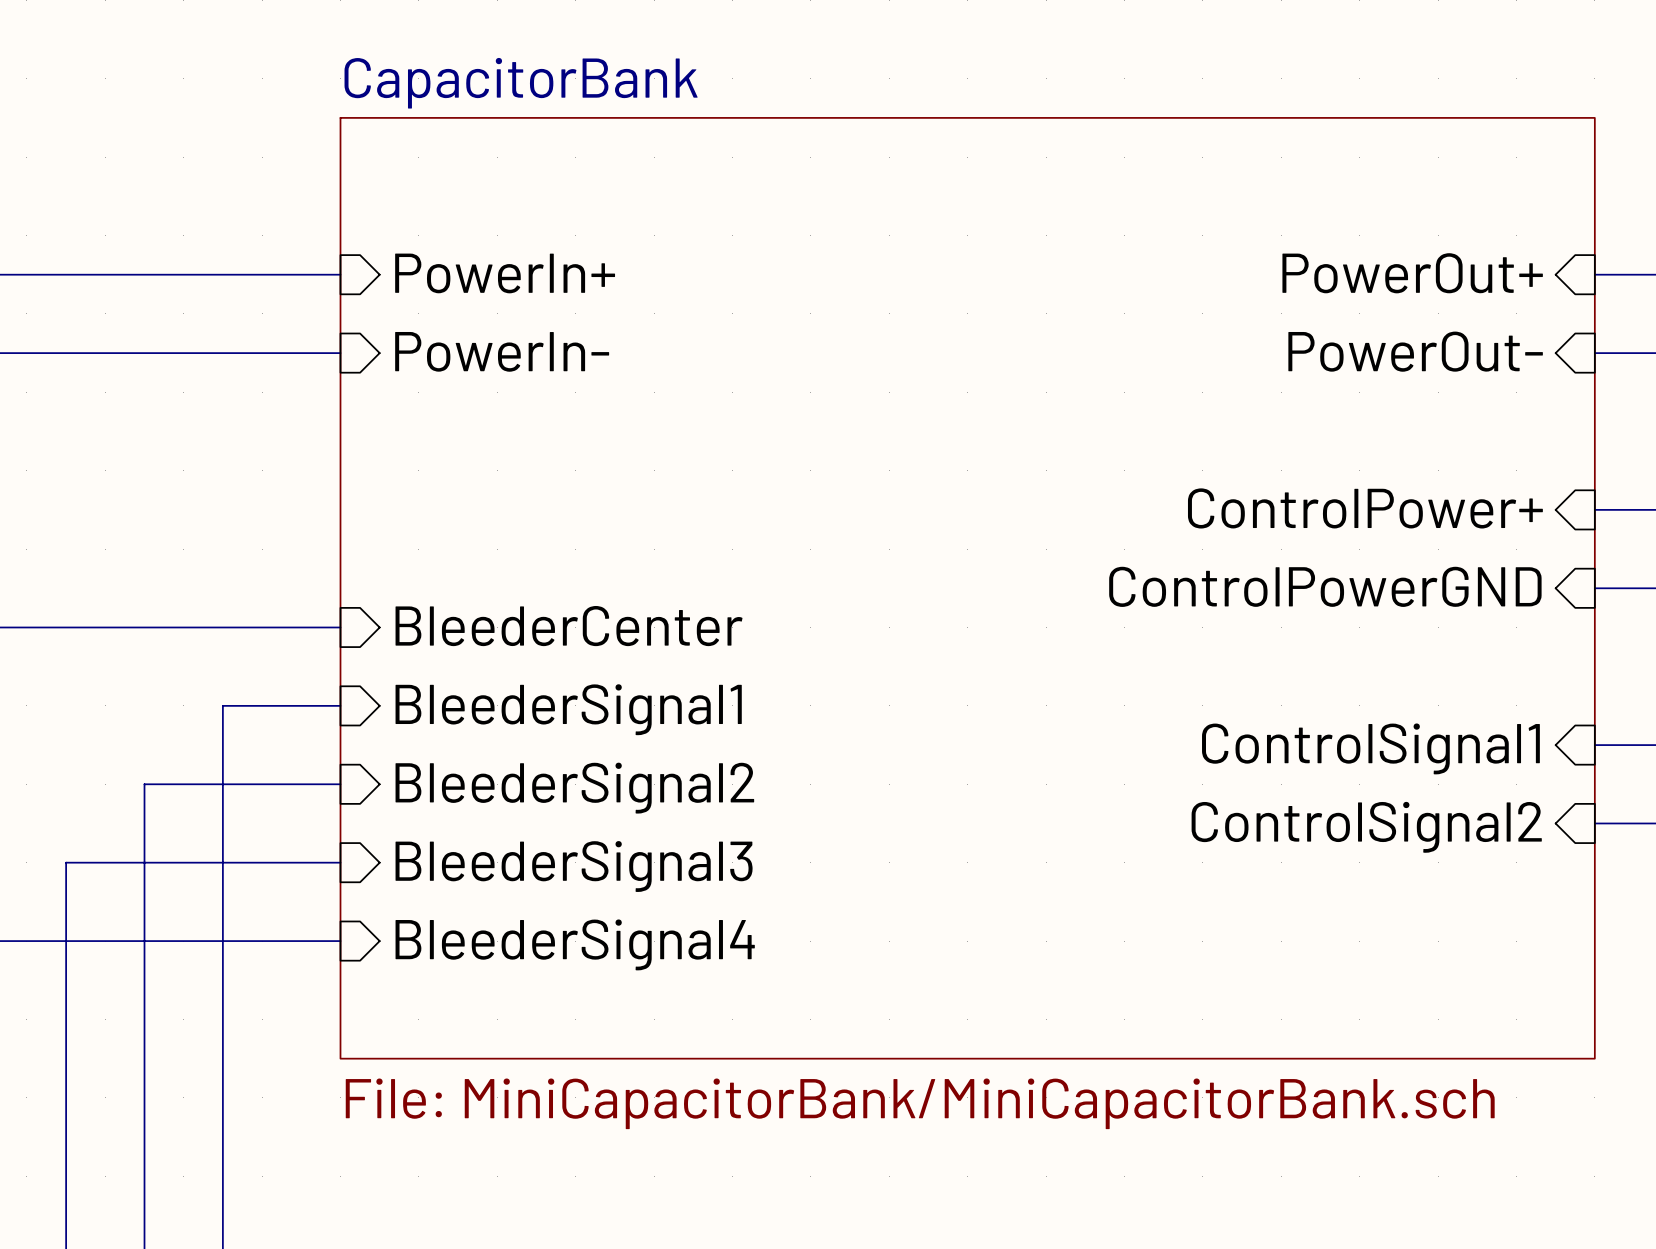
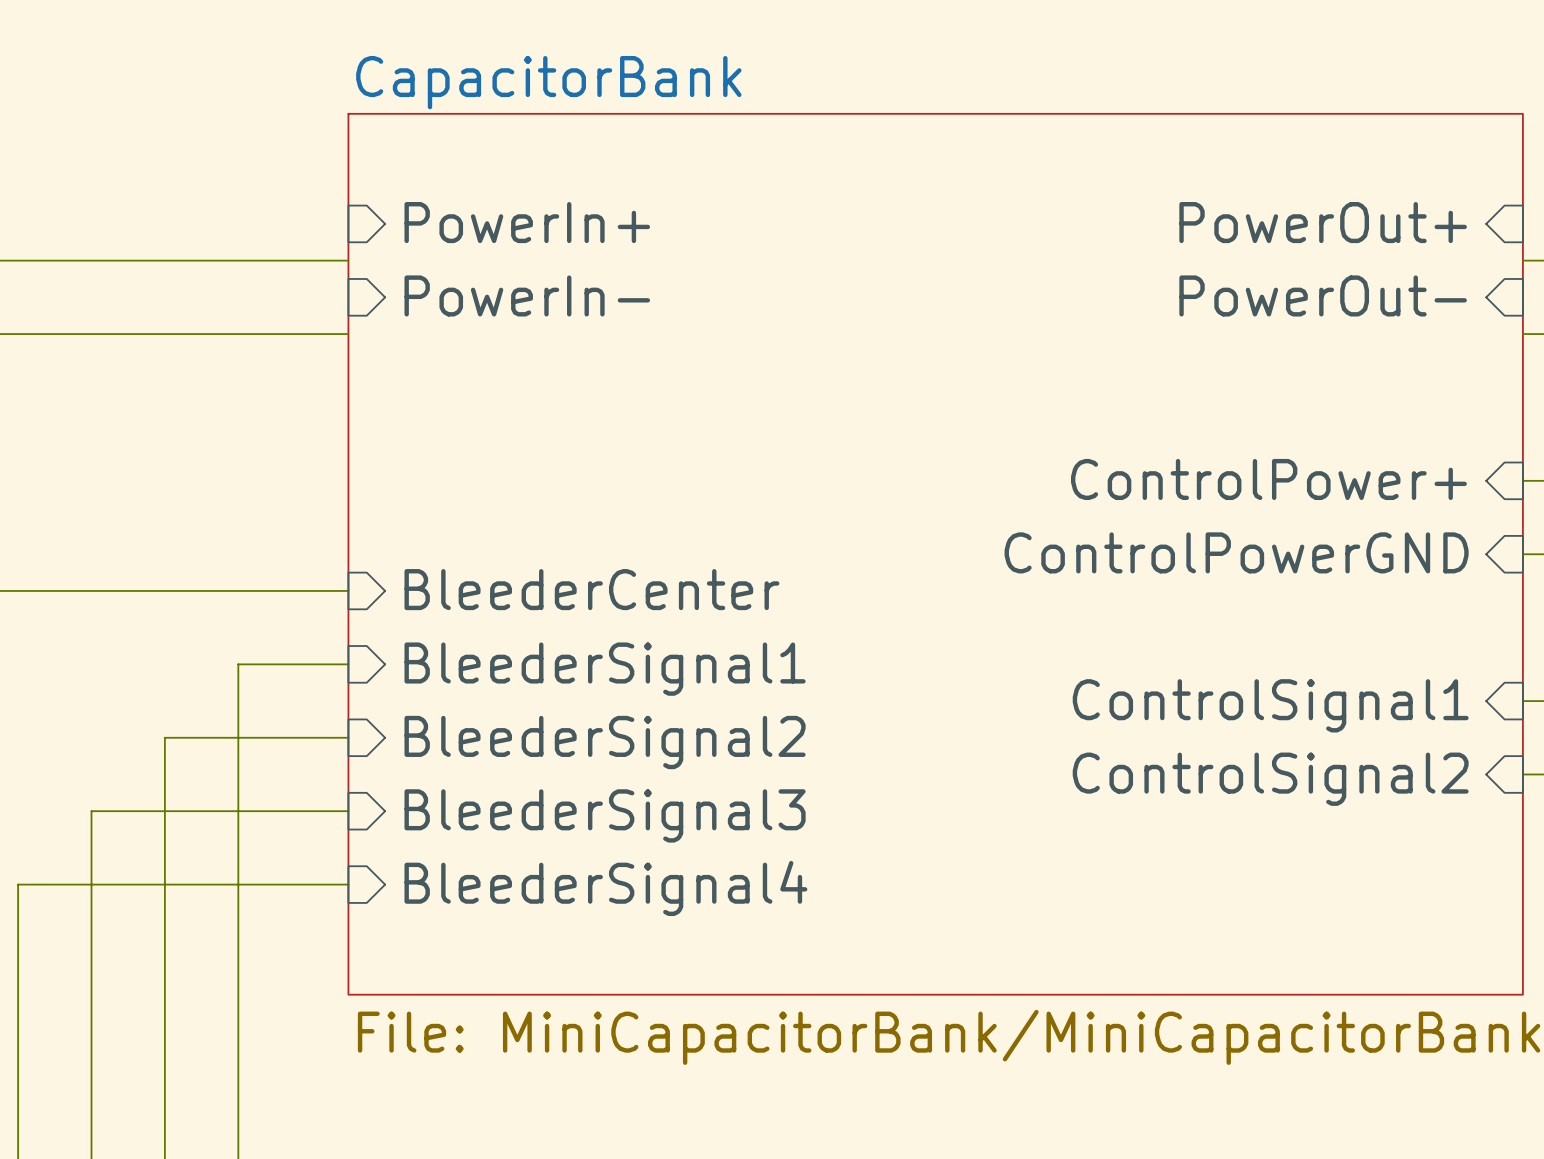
sheet pin position: PowerIn+ (505, 273) -> PowerIn+ (527, 222)
sheet pin position: PowerOut+ (1412, 273) -> PowerOut+ (1323, 222)
sheet pin position: PowerIn- (502, 351) -> PowerIn- (527, 295)
sheet pin position: PowerOut- (1415, 351) -> PowerOut- (1323, 295)

